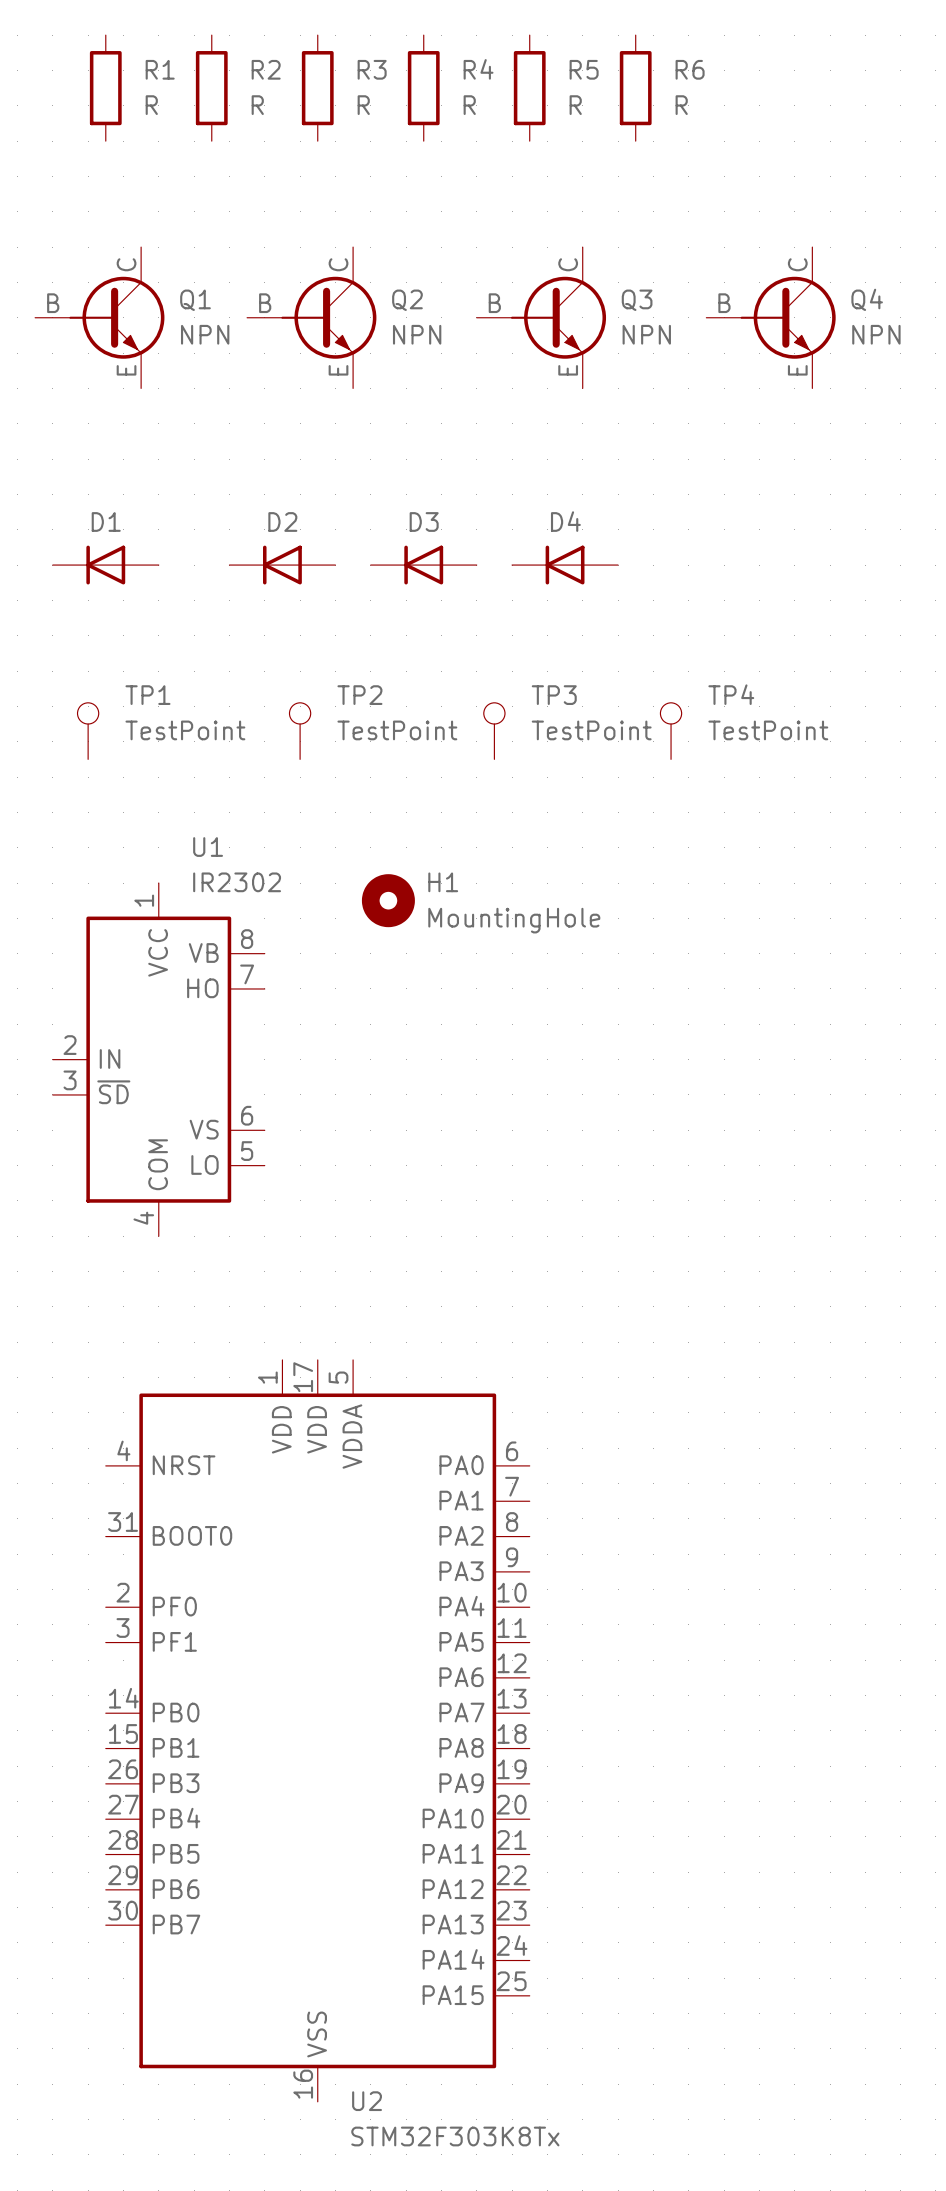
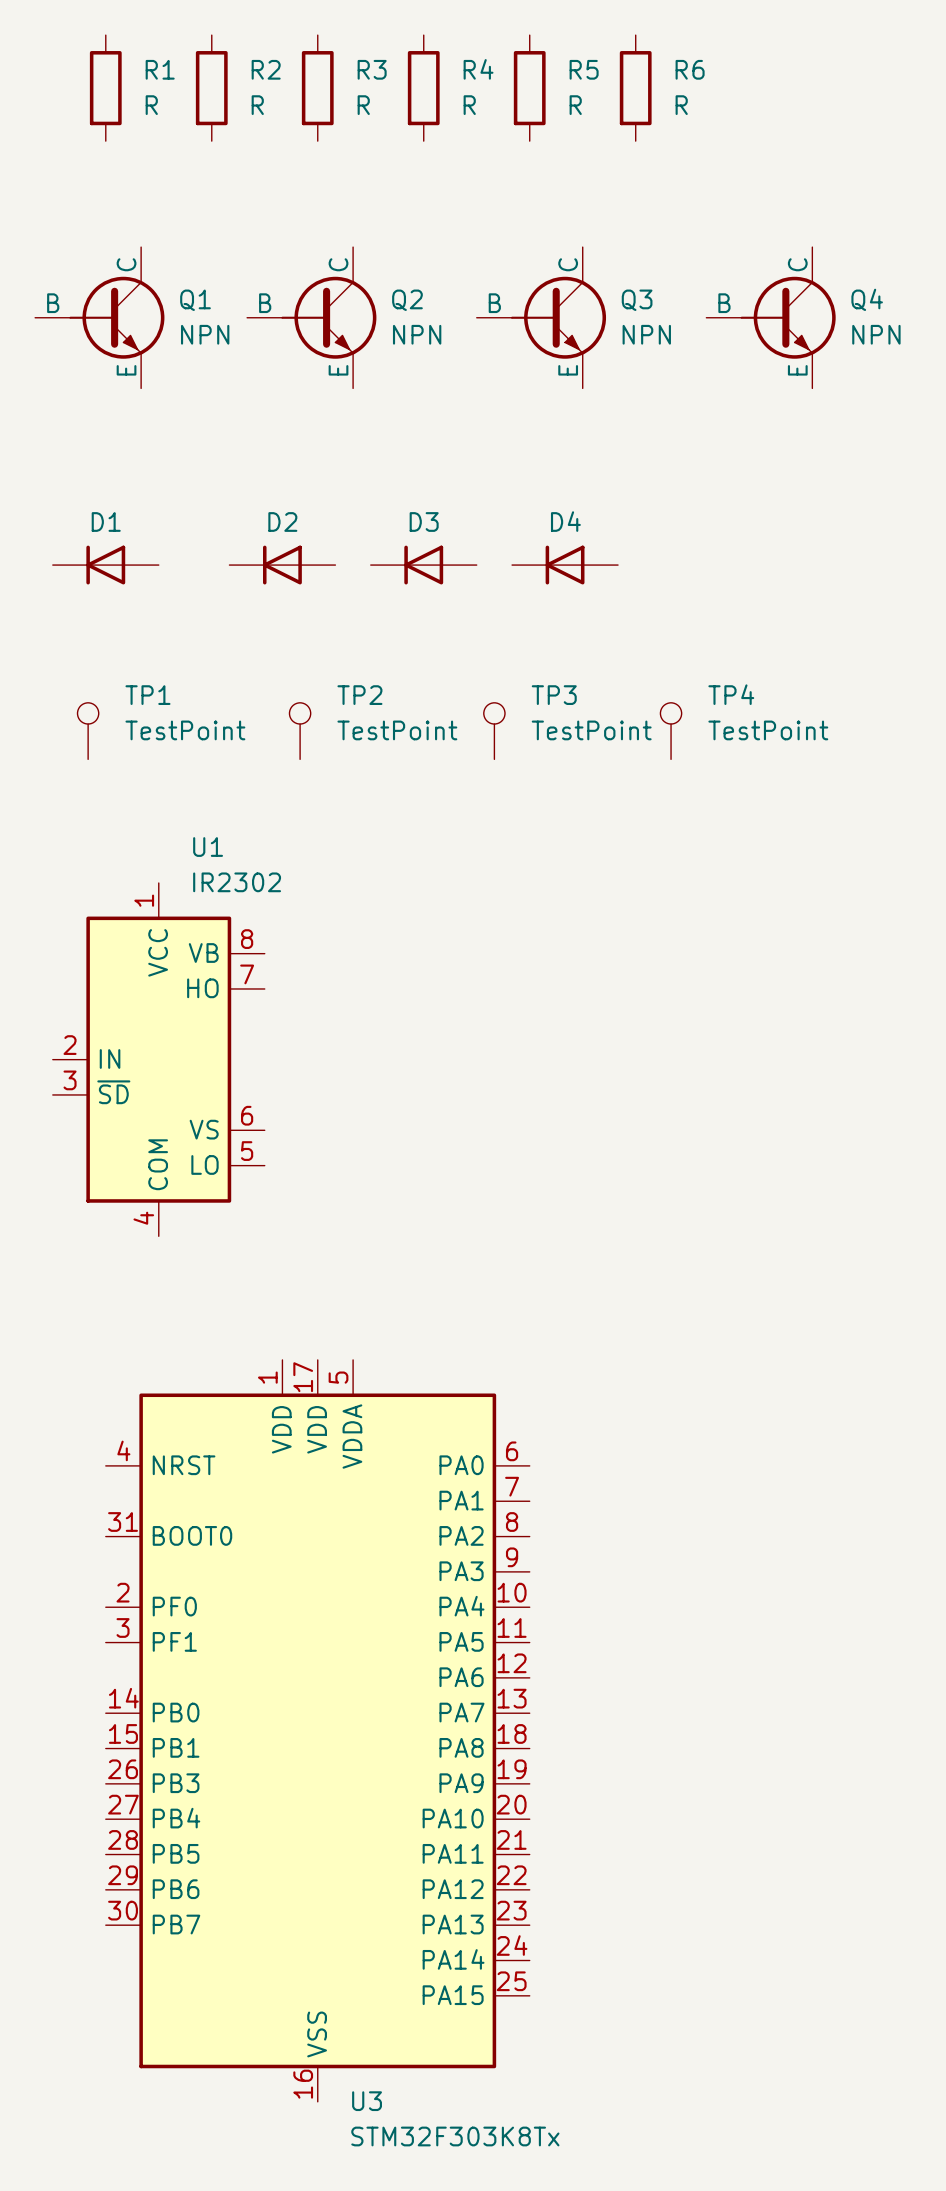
H1: MountingHole (388, 900) -> none
U2 name: U2 (367, 2101) -> U3 (367, 2101)

